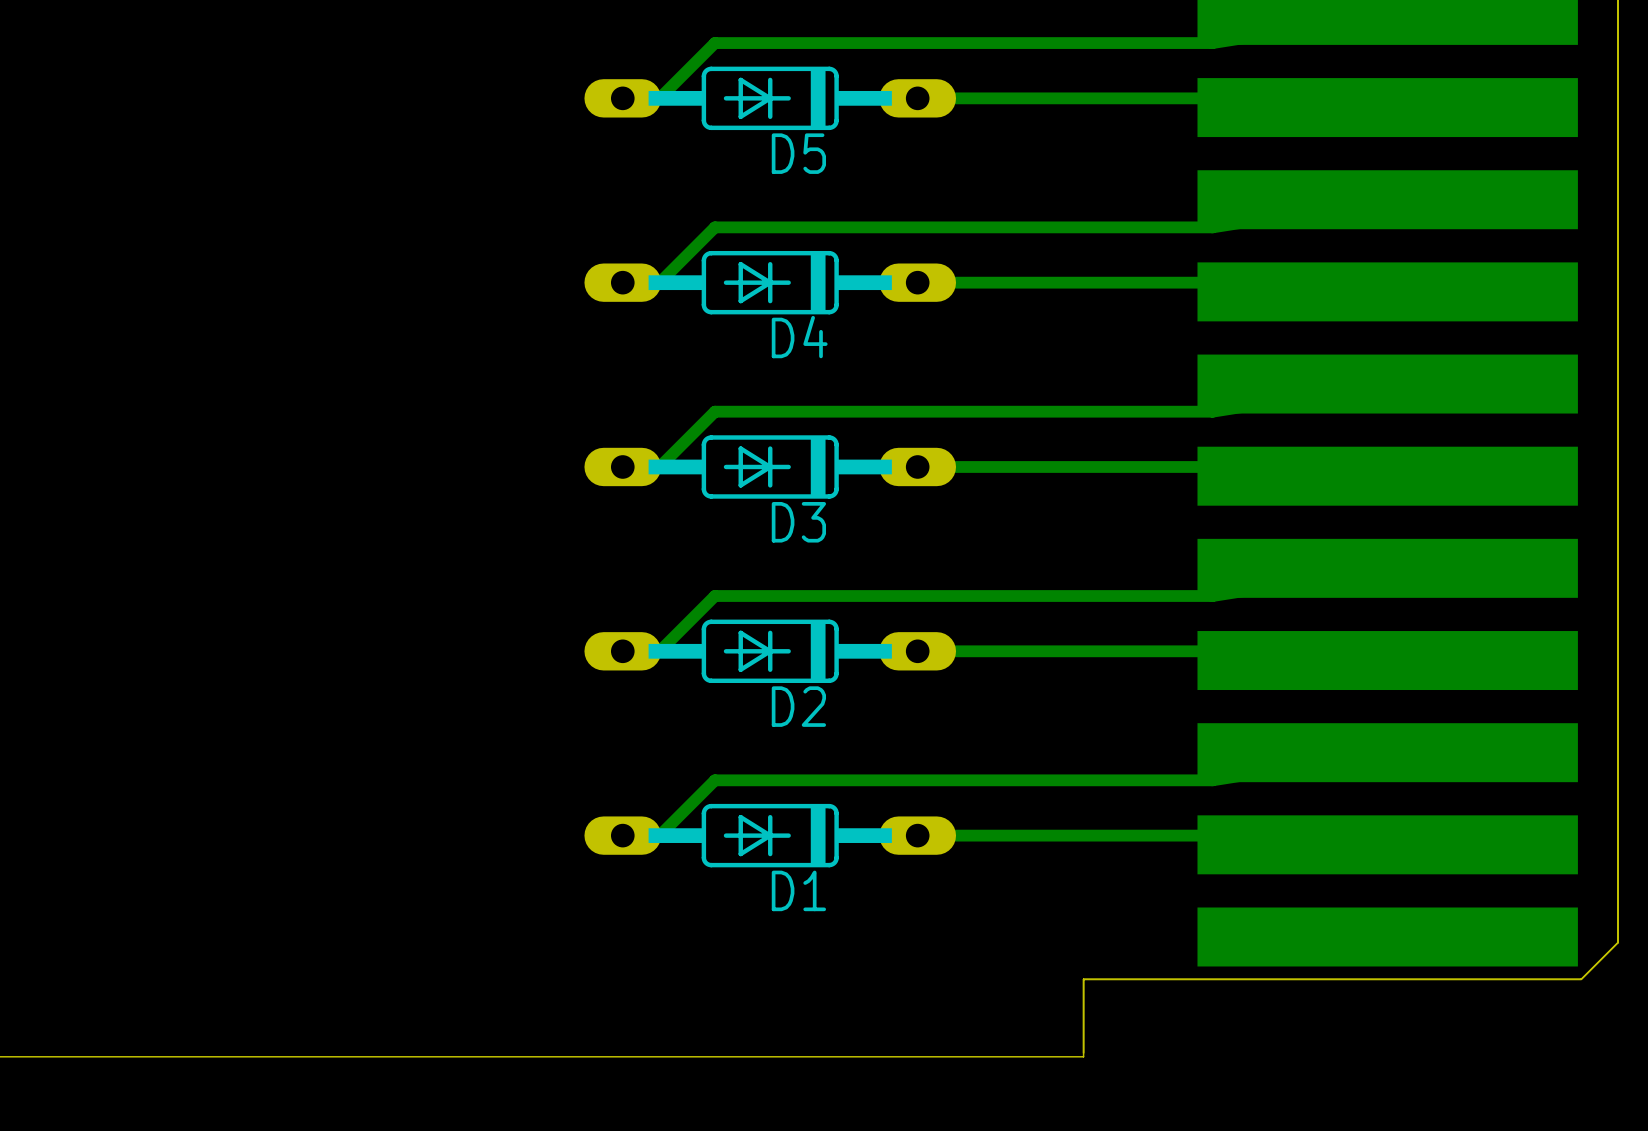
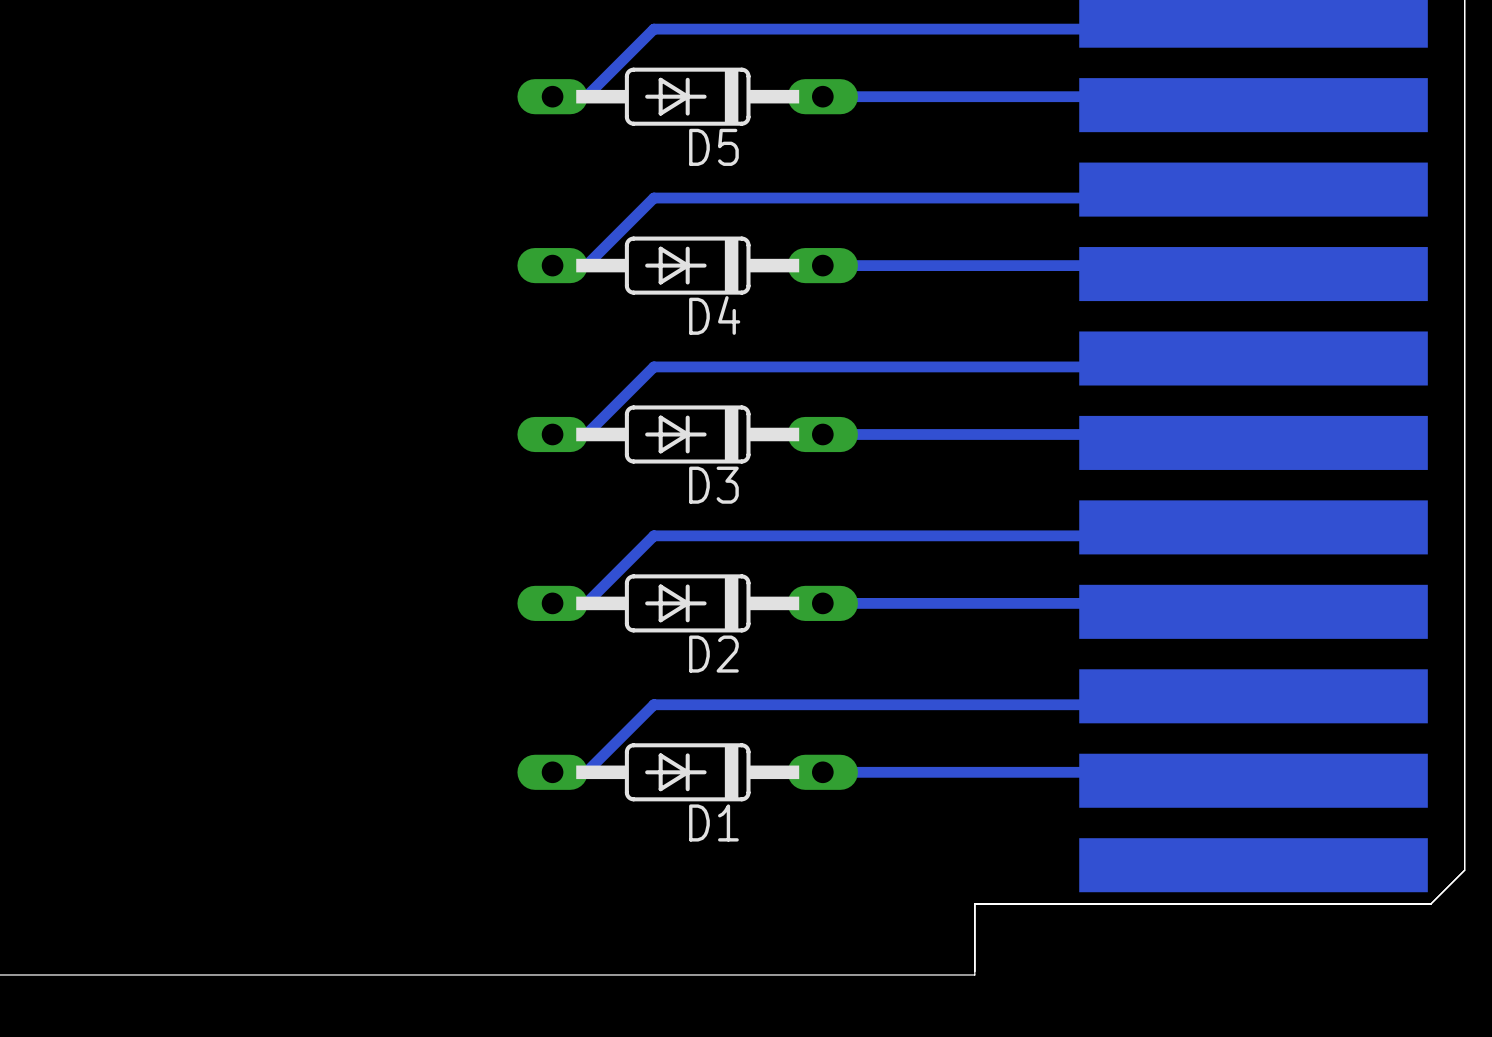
bottom track: (1387, 15) (1212, 43) (714, 43) -> (1253, 20) (1109, 29) (653, 29) (637, 46)
bottom track: (1387, 199) (1212, 227) (714, 227) -> (1253, 189) (1093, 198) (653, 198) (637, 214)
bottom track: (1387, 384) (1212, 411) (714, 411) -> (1253, 358) (1109, 366) (653, 366) (637, 383)
bottom track: (1387, 568) (1212, 596) (714, 596) -> (1253, 527) (1109, 535) (653, 535) (637, 552)
bottom track: (1387, 752) (1212, 780) (714, 780) -> (1253, 696) (1109, 704) (653, 704) (637, 721)

